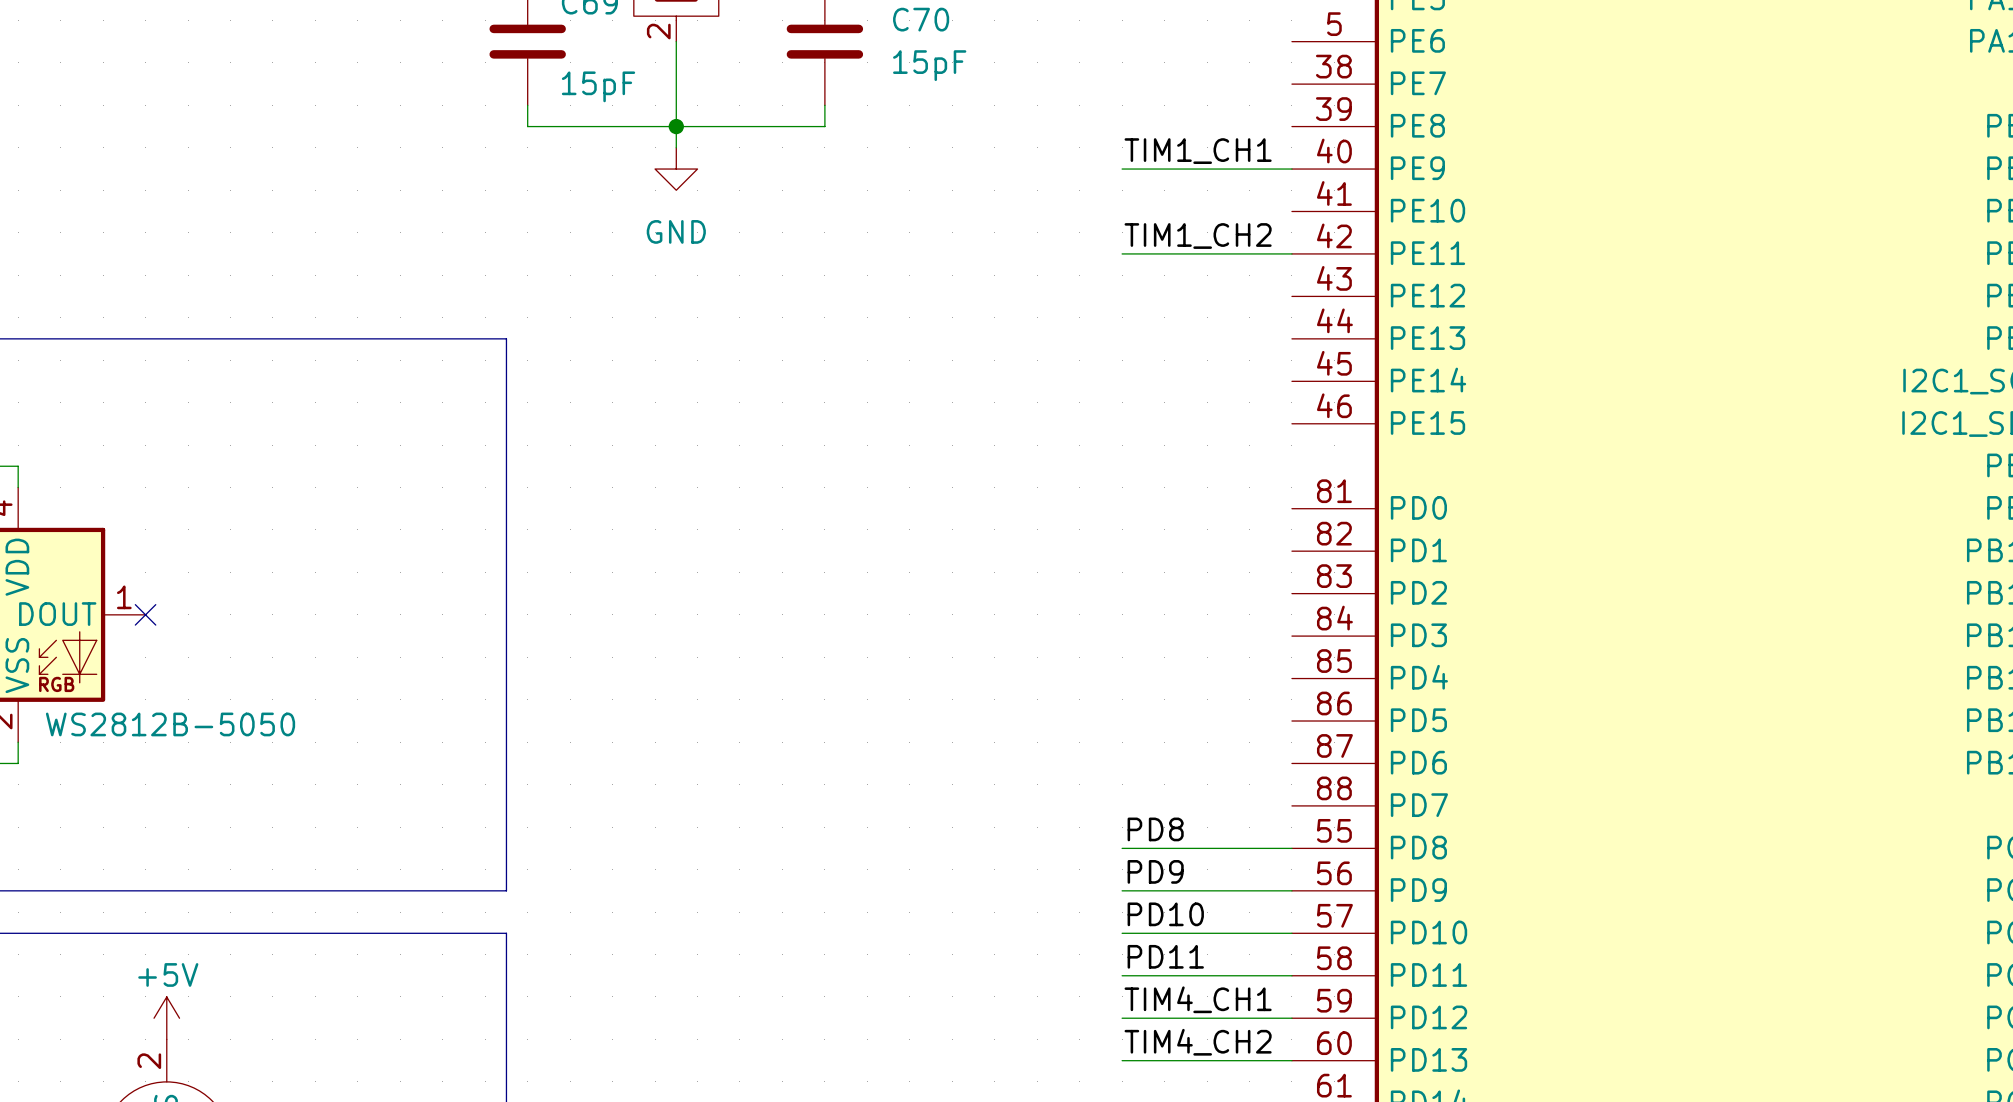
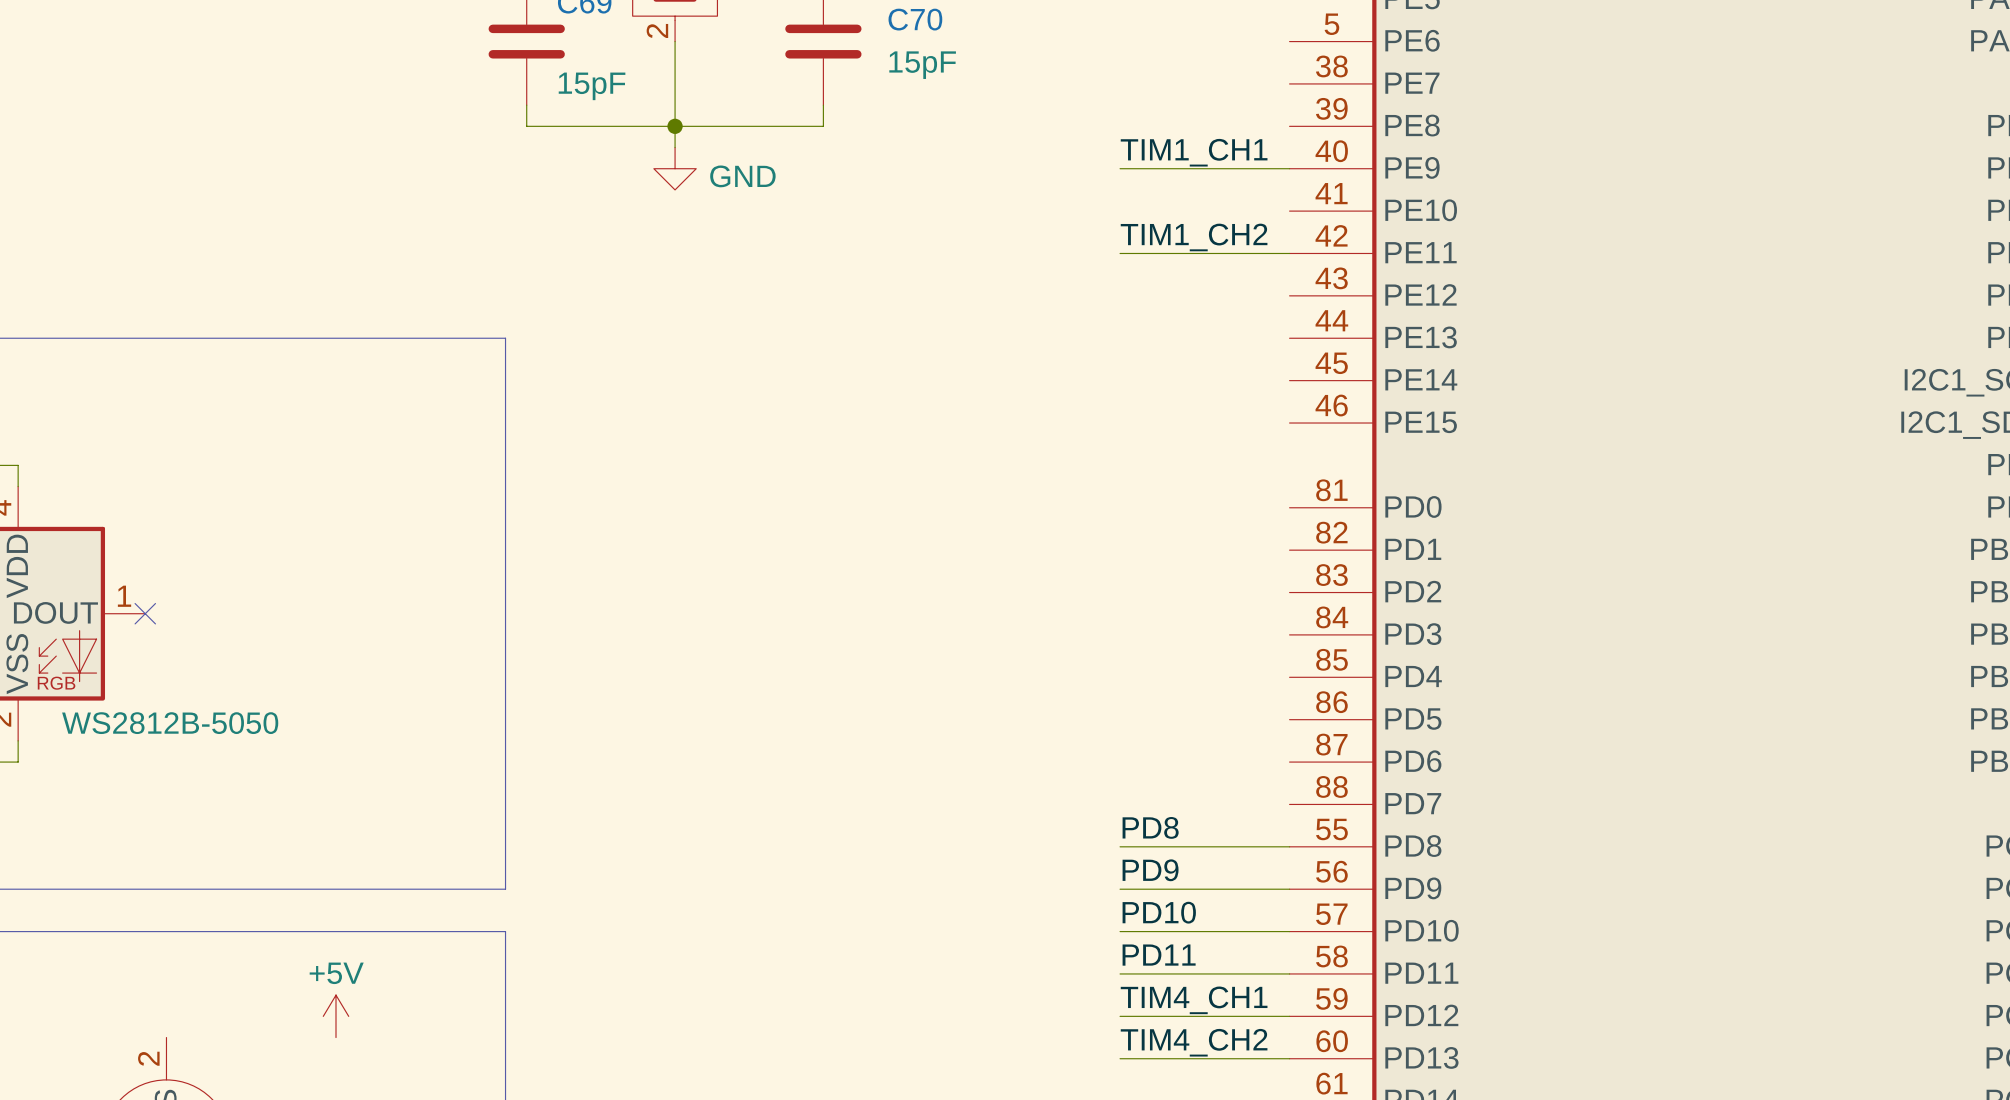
power symbol text position: GND (676, 231) -> GND (742, 176)
power symbol position: +5V (166, 1018) -> +5V (336, 1016)

